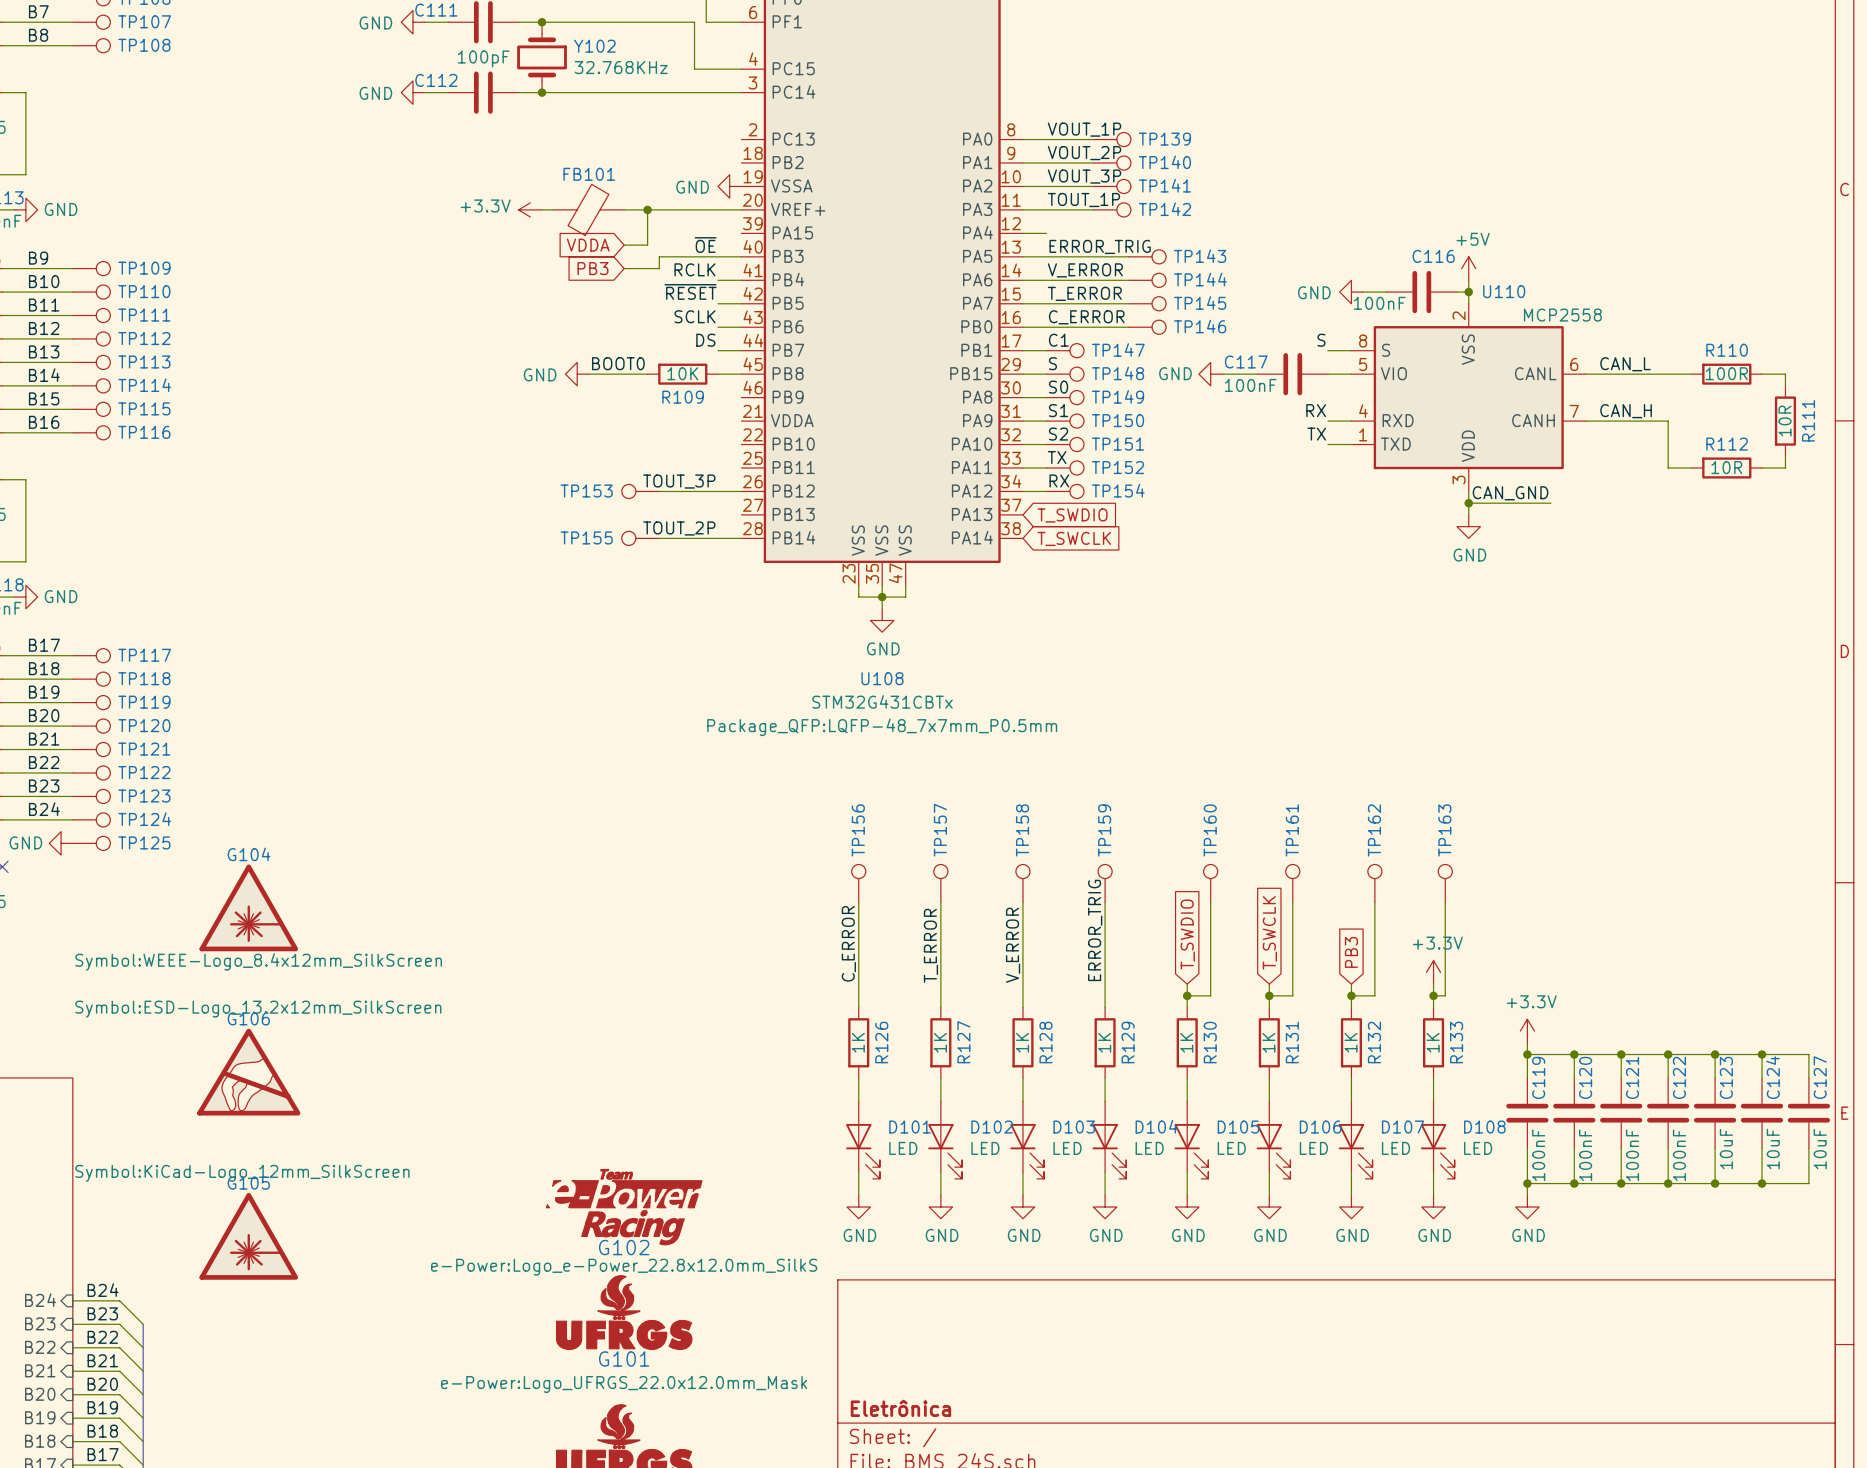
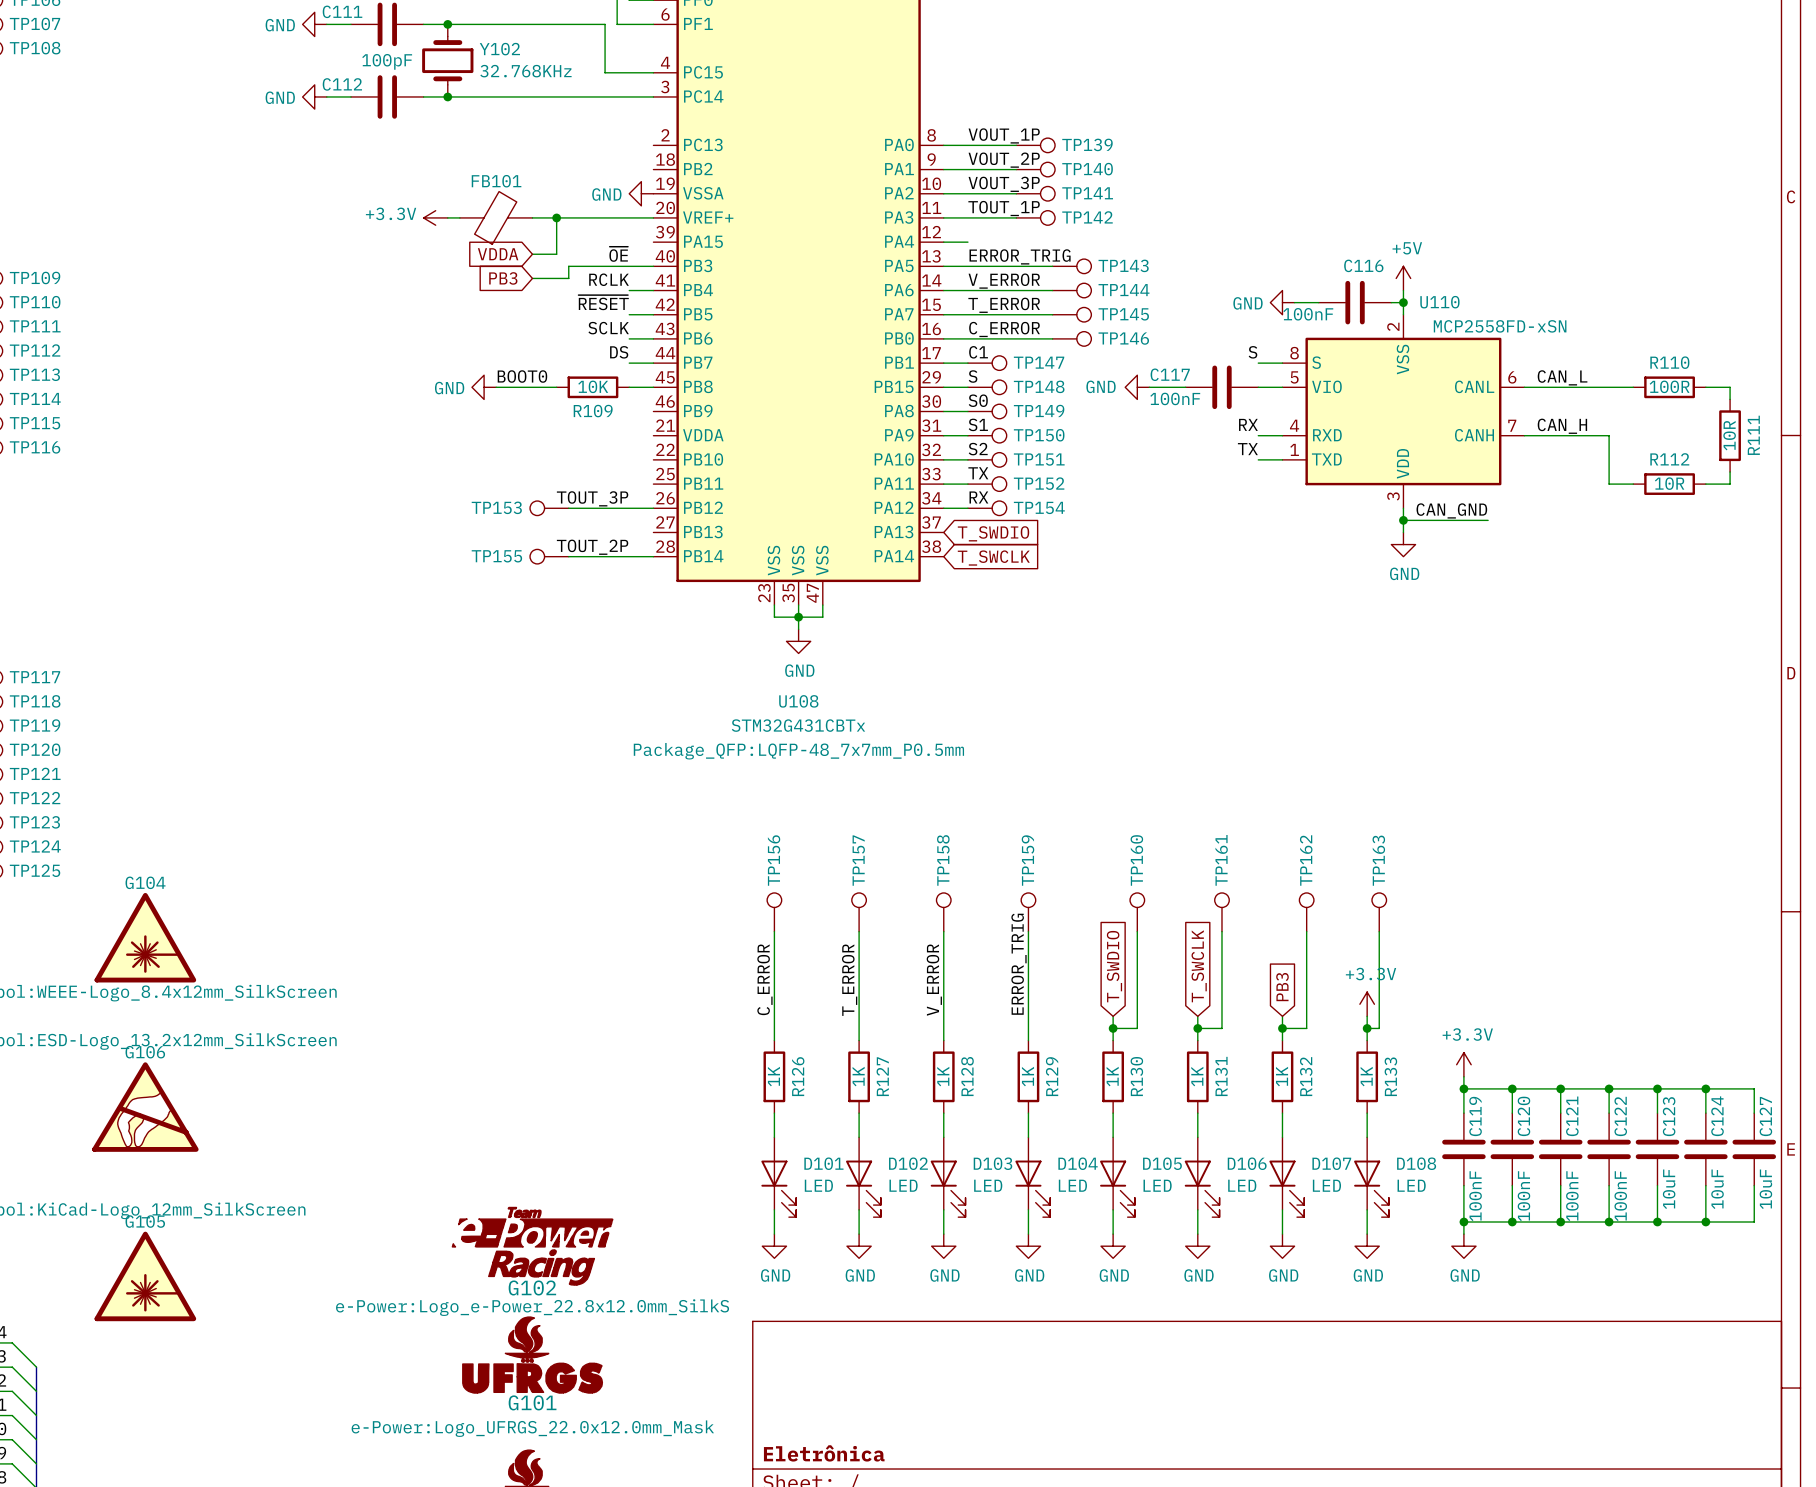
U110 value: MCP2558 (1562, 315) -> MCP2558FD-xSN (1500, 326)

